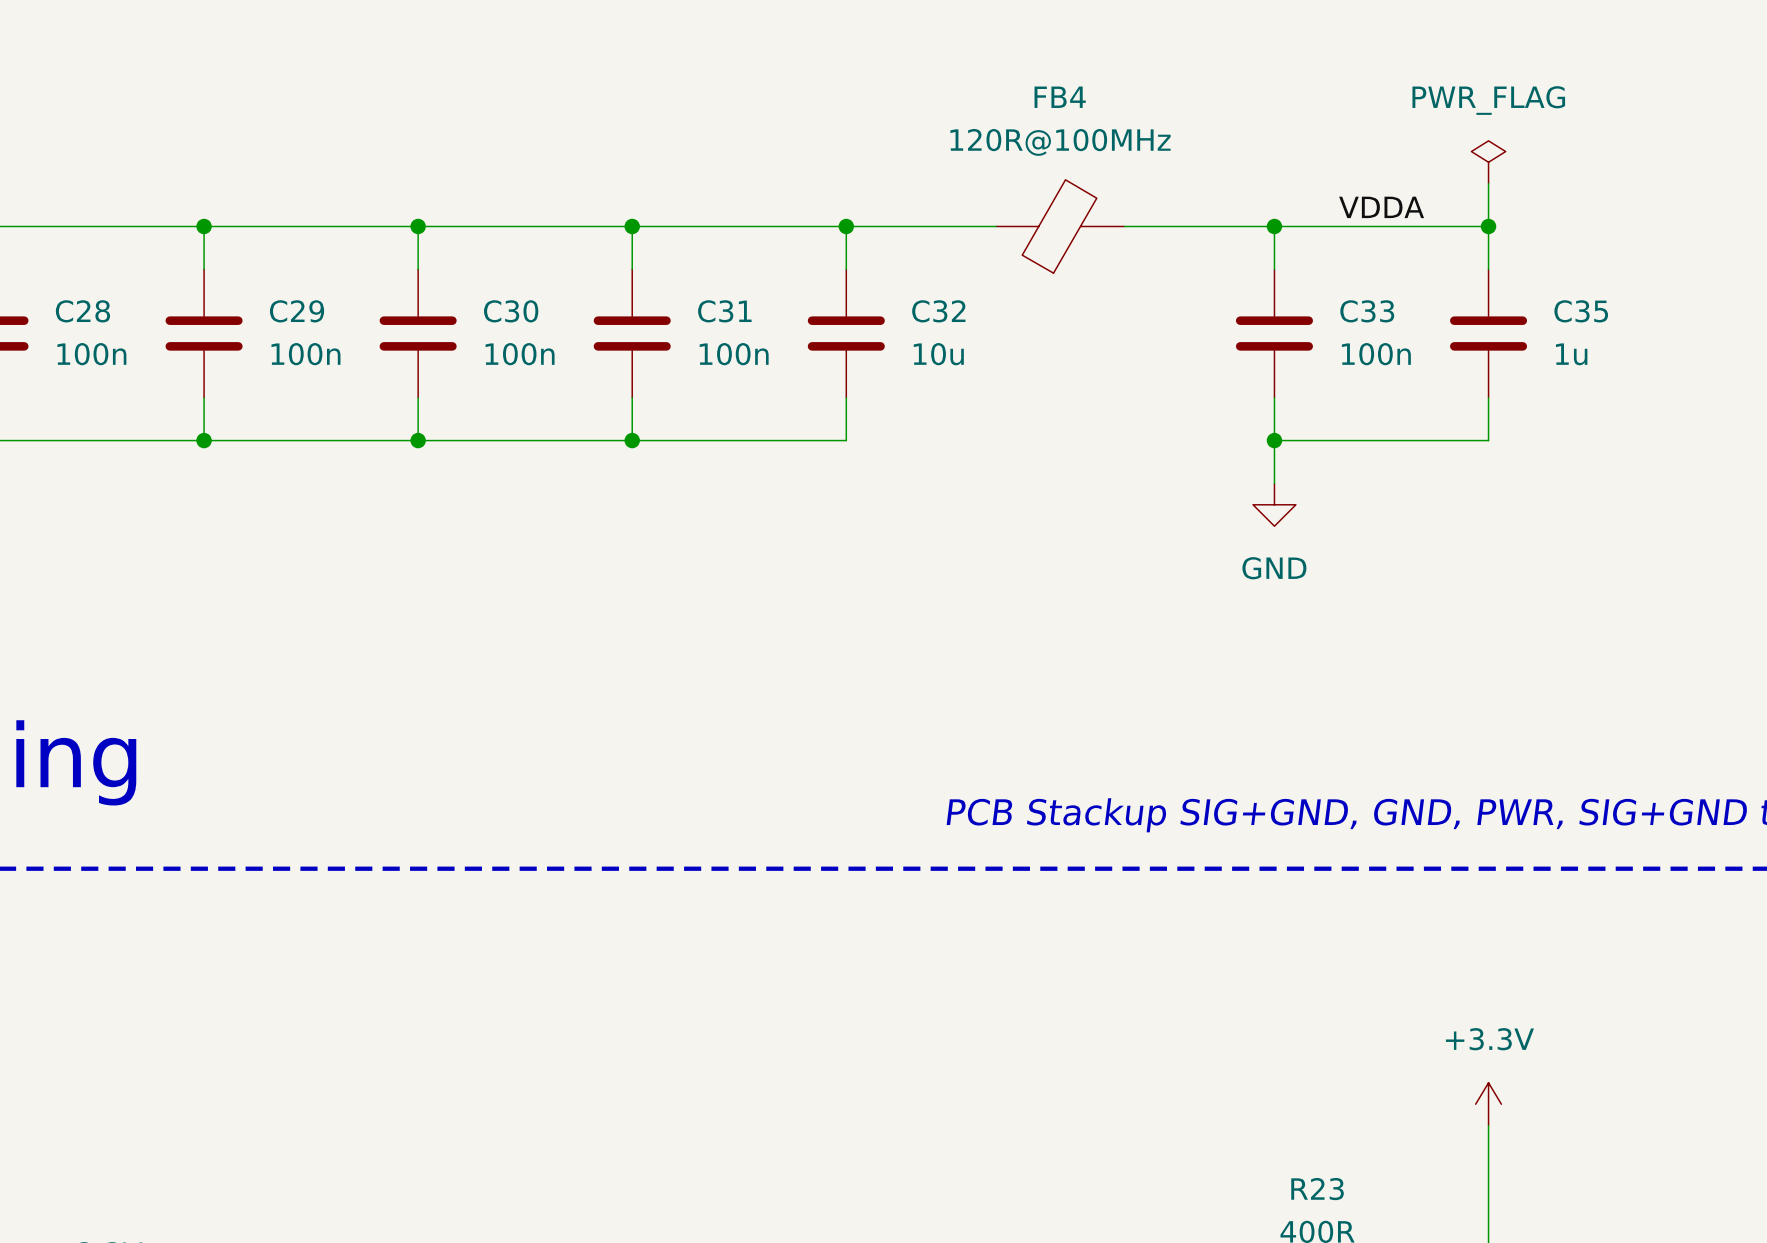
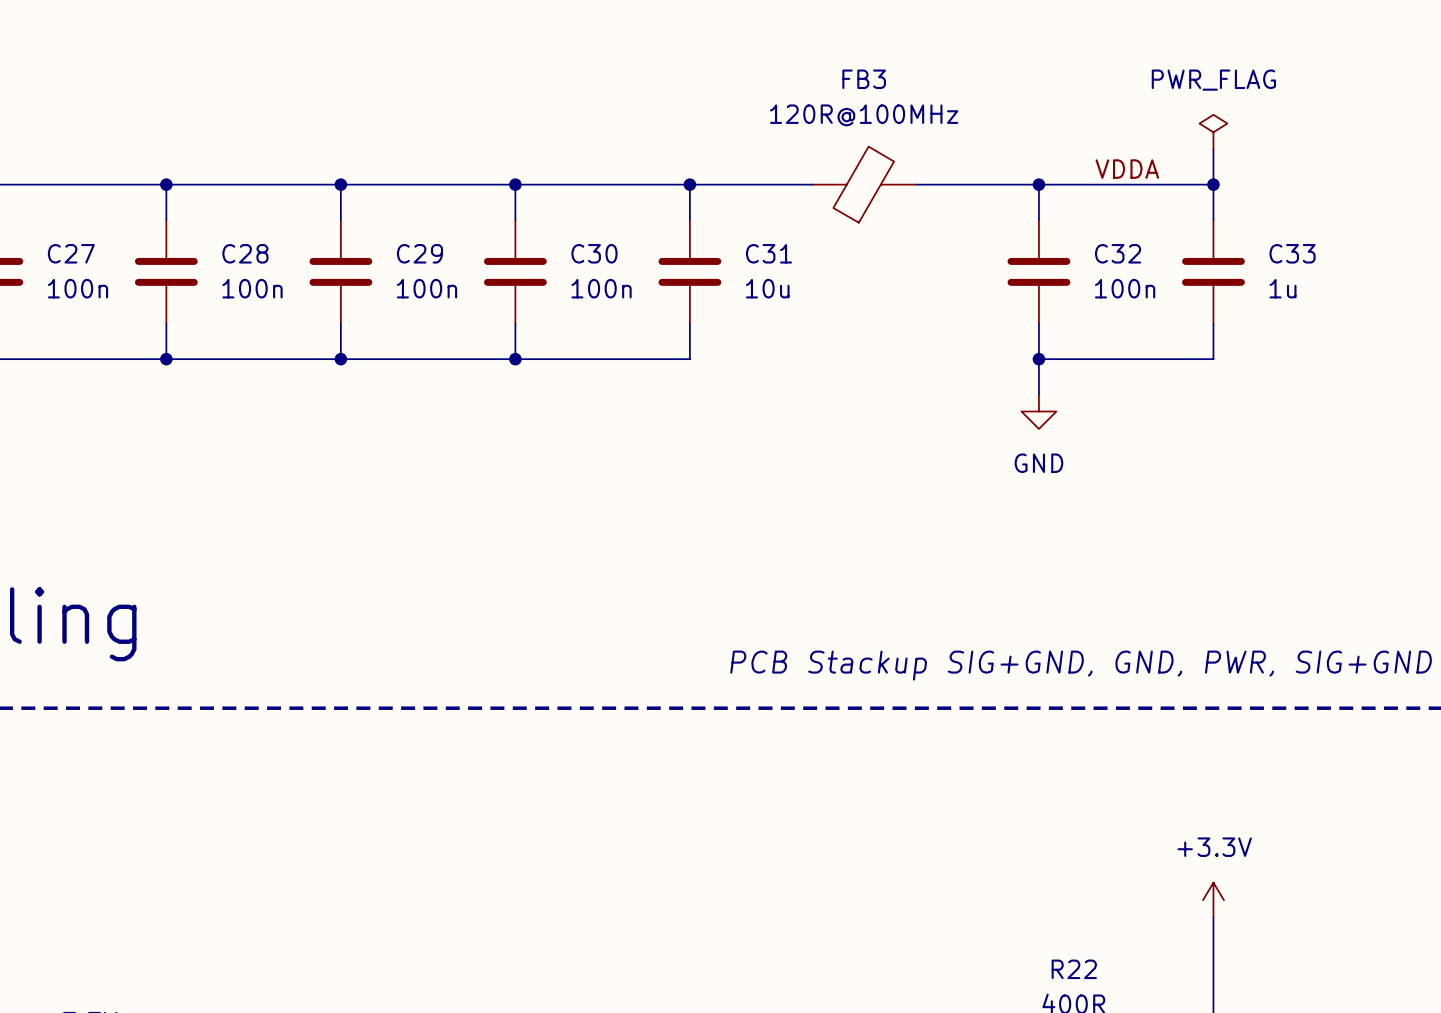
FB4 name: FB4 (1060, 97) -> FB3 (864, 79)
C28 name: C28 (82, 311) -> C27 (71, 253)
C29 name: C29 (297, 311) -> C28 (245, 253)
C30 name: C30 (511, 311) -> C29 (419, 253)
C31 name: C31 (724, 311) -> C30 (594, 253)
C32 name: C32 (938, 311) -> C31 (768, 253)
C33 name: C33 (1367, 311) -> C32 (1118, 253)
C35 name: C35 (1581, 311) -> C33 (1292, 253)
R23 name: R23 (1317, 1189) -> R22 (1074, 969)

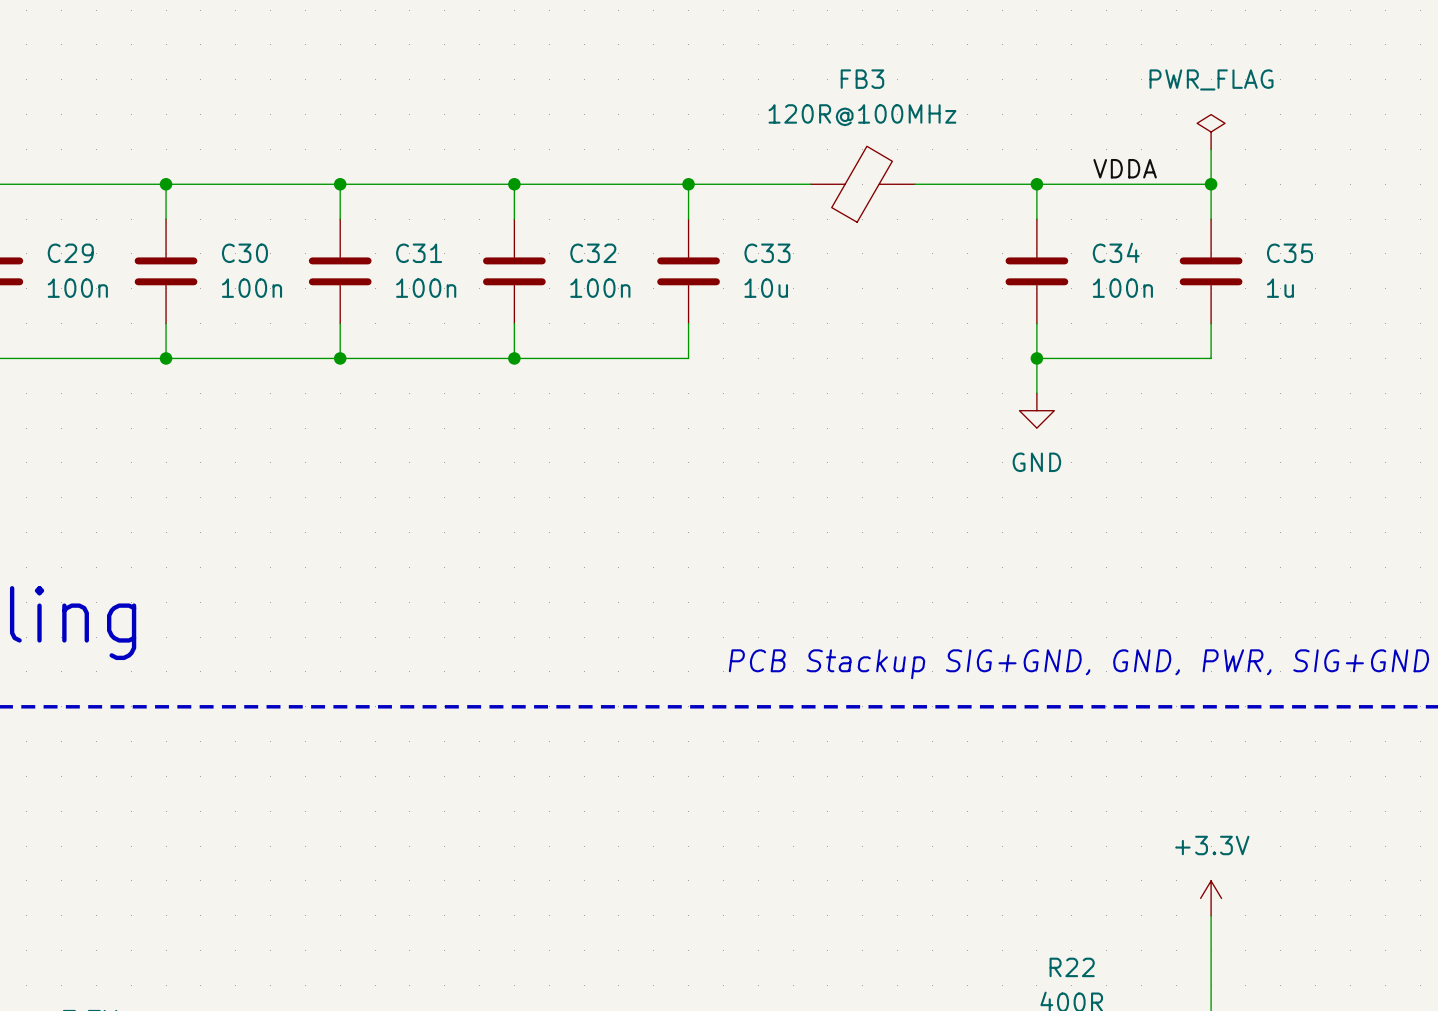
C27 name: C27 (71, 253) -> C29 (70, 253)
C28 name: C28 (245, 253) -> C30 (244, 253)
C29 name: C29 (419, 253) -> C31 (419, 253)
C30 name: C30 (594, 253) -> C32 (593, 253)
C31 name: C31 (768, 253) -> C33 (767, 253)
C32 name: C32 (1118, 253) -> C34 (1116, 252)
C33 name: C33 (1292, 253) -> C35 (1290, 253)

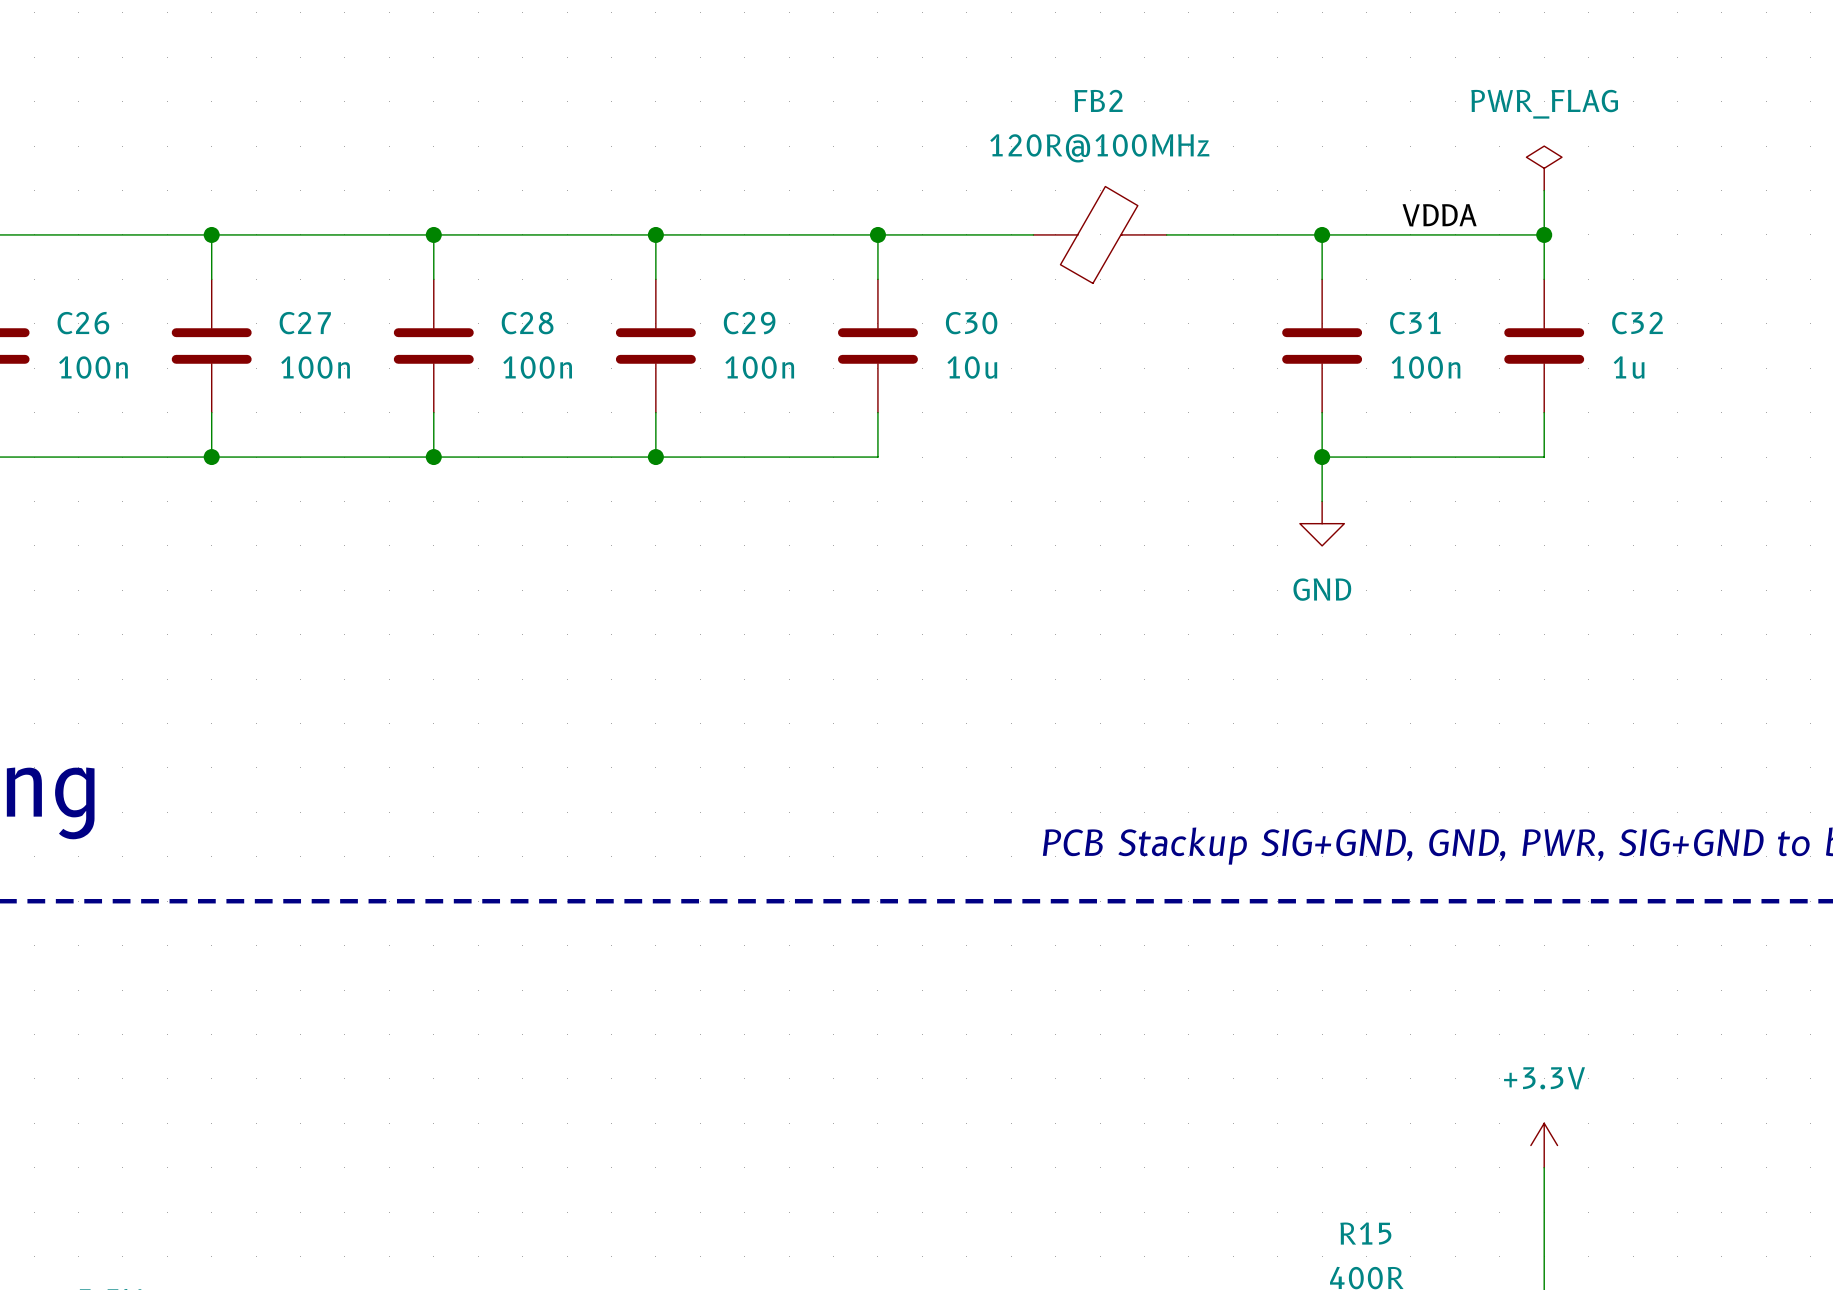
FB3 name: FB3 (862, 79) -> FB2 (1098, 100)
C34 name: C34 (1116, 252) -> C31 (1415, 323)
C29 name: C29 (70, 253) -> C26 (83, 323)
C30 name: C30 (244, 253) -> C27 (305, 323)
C31 name: C31 (419, 253) -> C28 (527, 323)
C32 name: C32 (593, 253) -> C29 (749, 323)
C33 name: C33 (767, 253) -> C30 (971, 323)
C35 name: C35 (1290, 253) -> C32 (1637, 323)
R22 name: R22 (1072, 967) -> R15 (1365, 1233)

